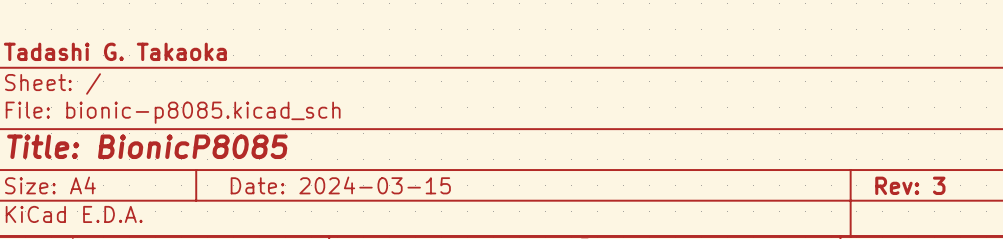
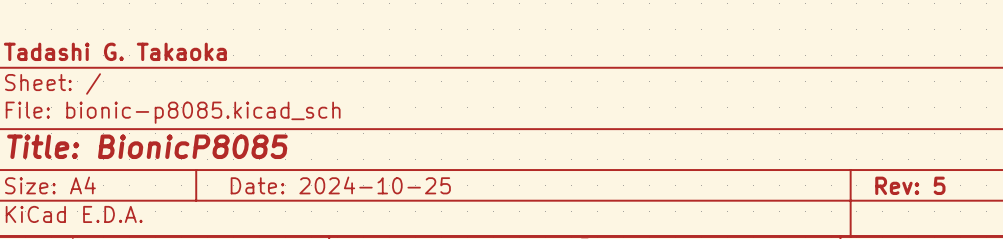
title block: Date: 2024-03-15 (340, 185) -> Date: 2024-10-25 (340, 185)
title block: Rev: 3 (910, 185) -> Rev: 5 (910, 185)

